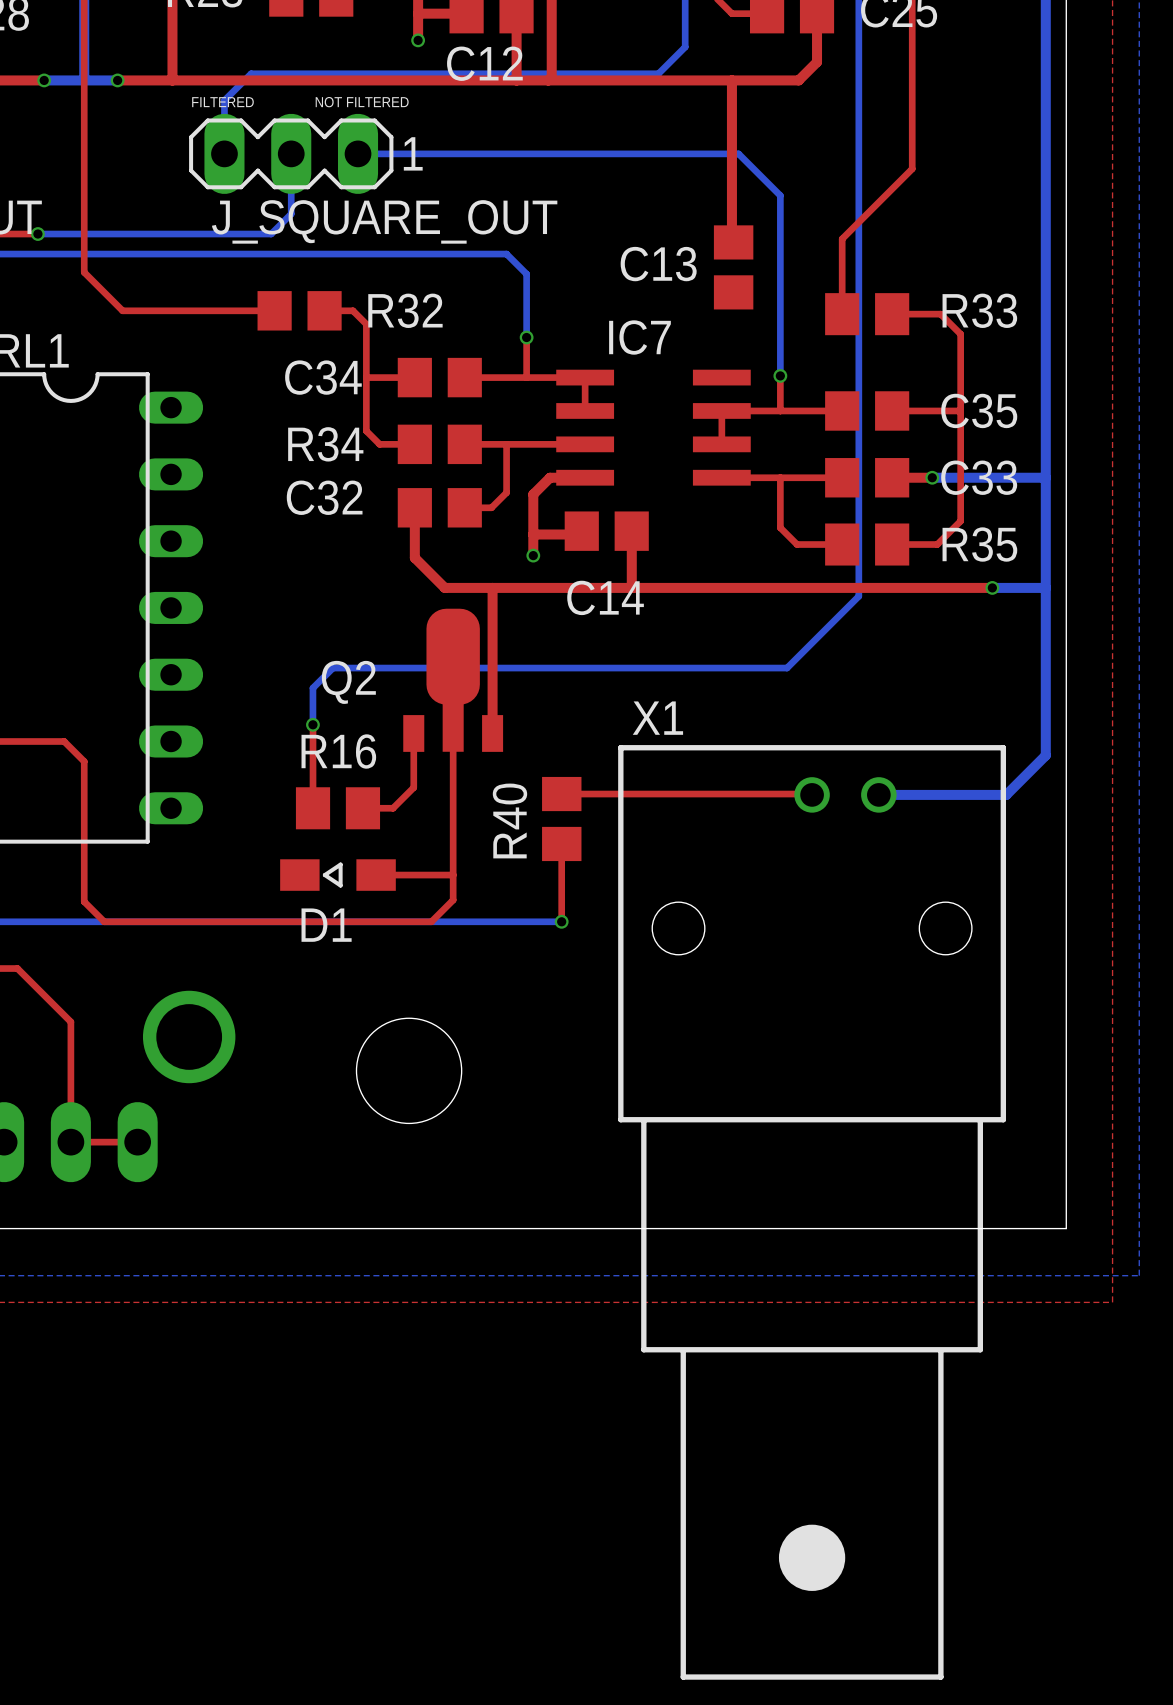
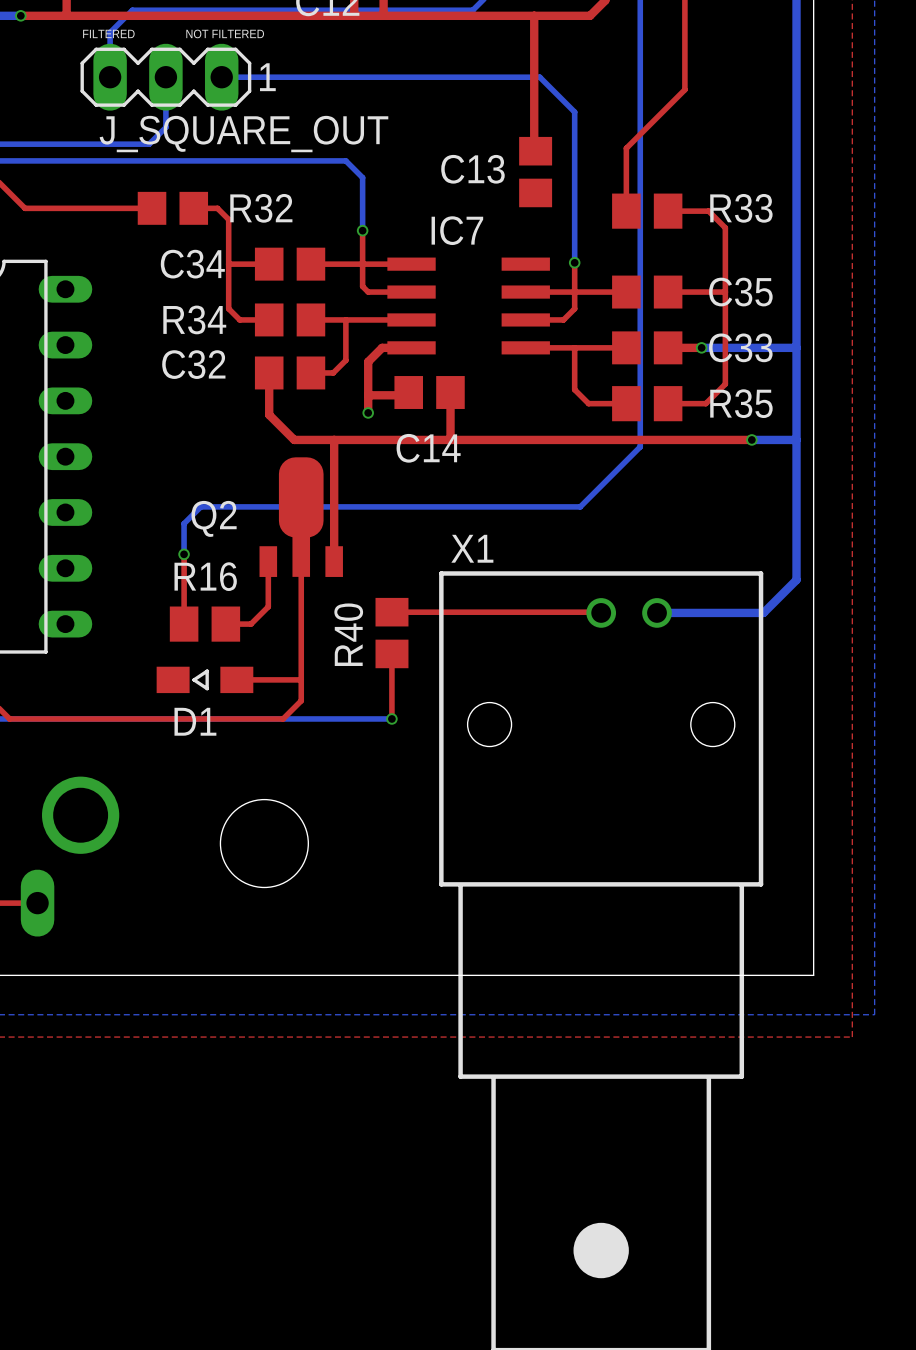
top track: (585, 377) (585, 410) -> (362, 264) (362, 286) (368, 292) (411, 292)
top track: (721, 410) (721, 444) -> (574, 292) (574, 308) (563, 319) (525, 319)

